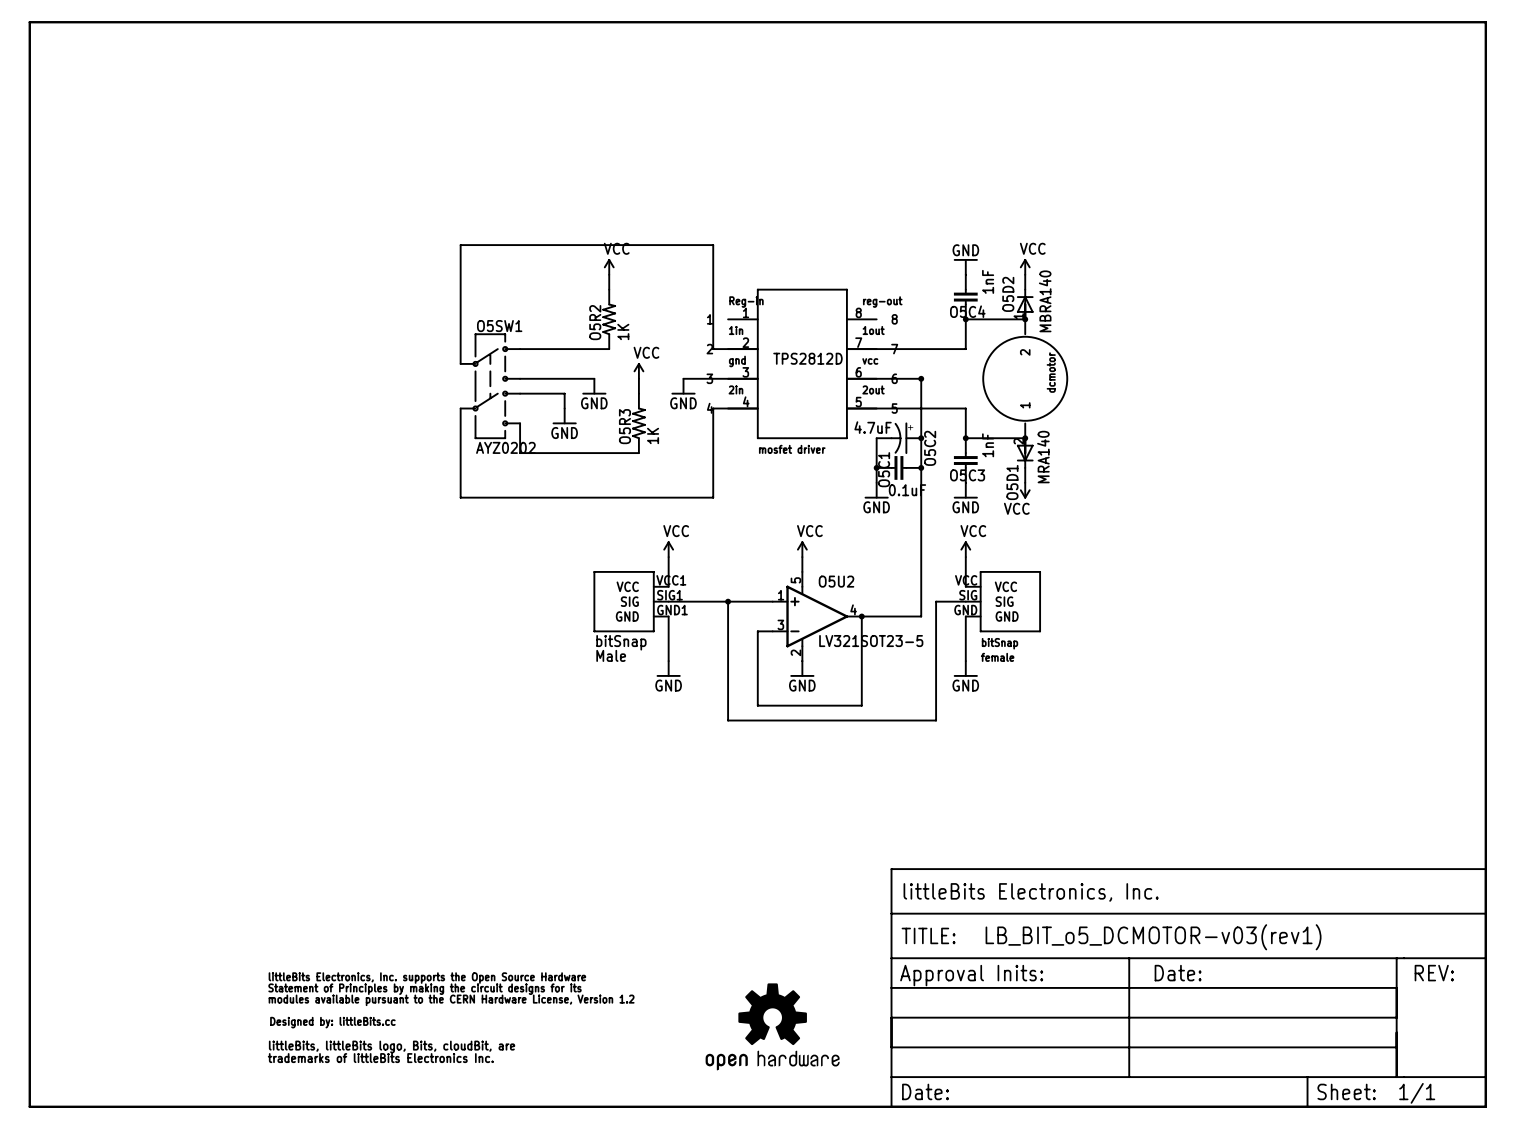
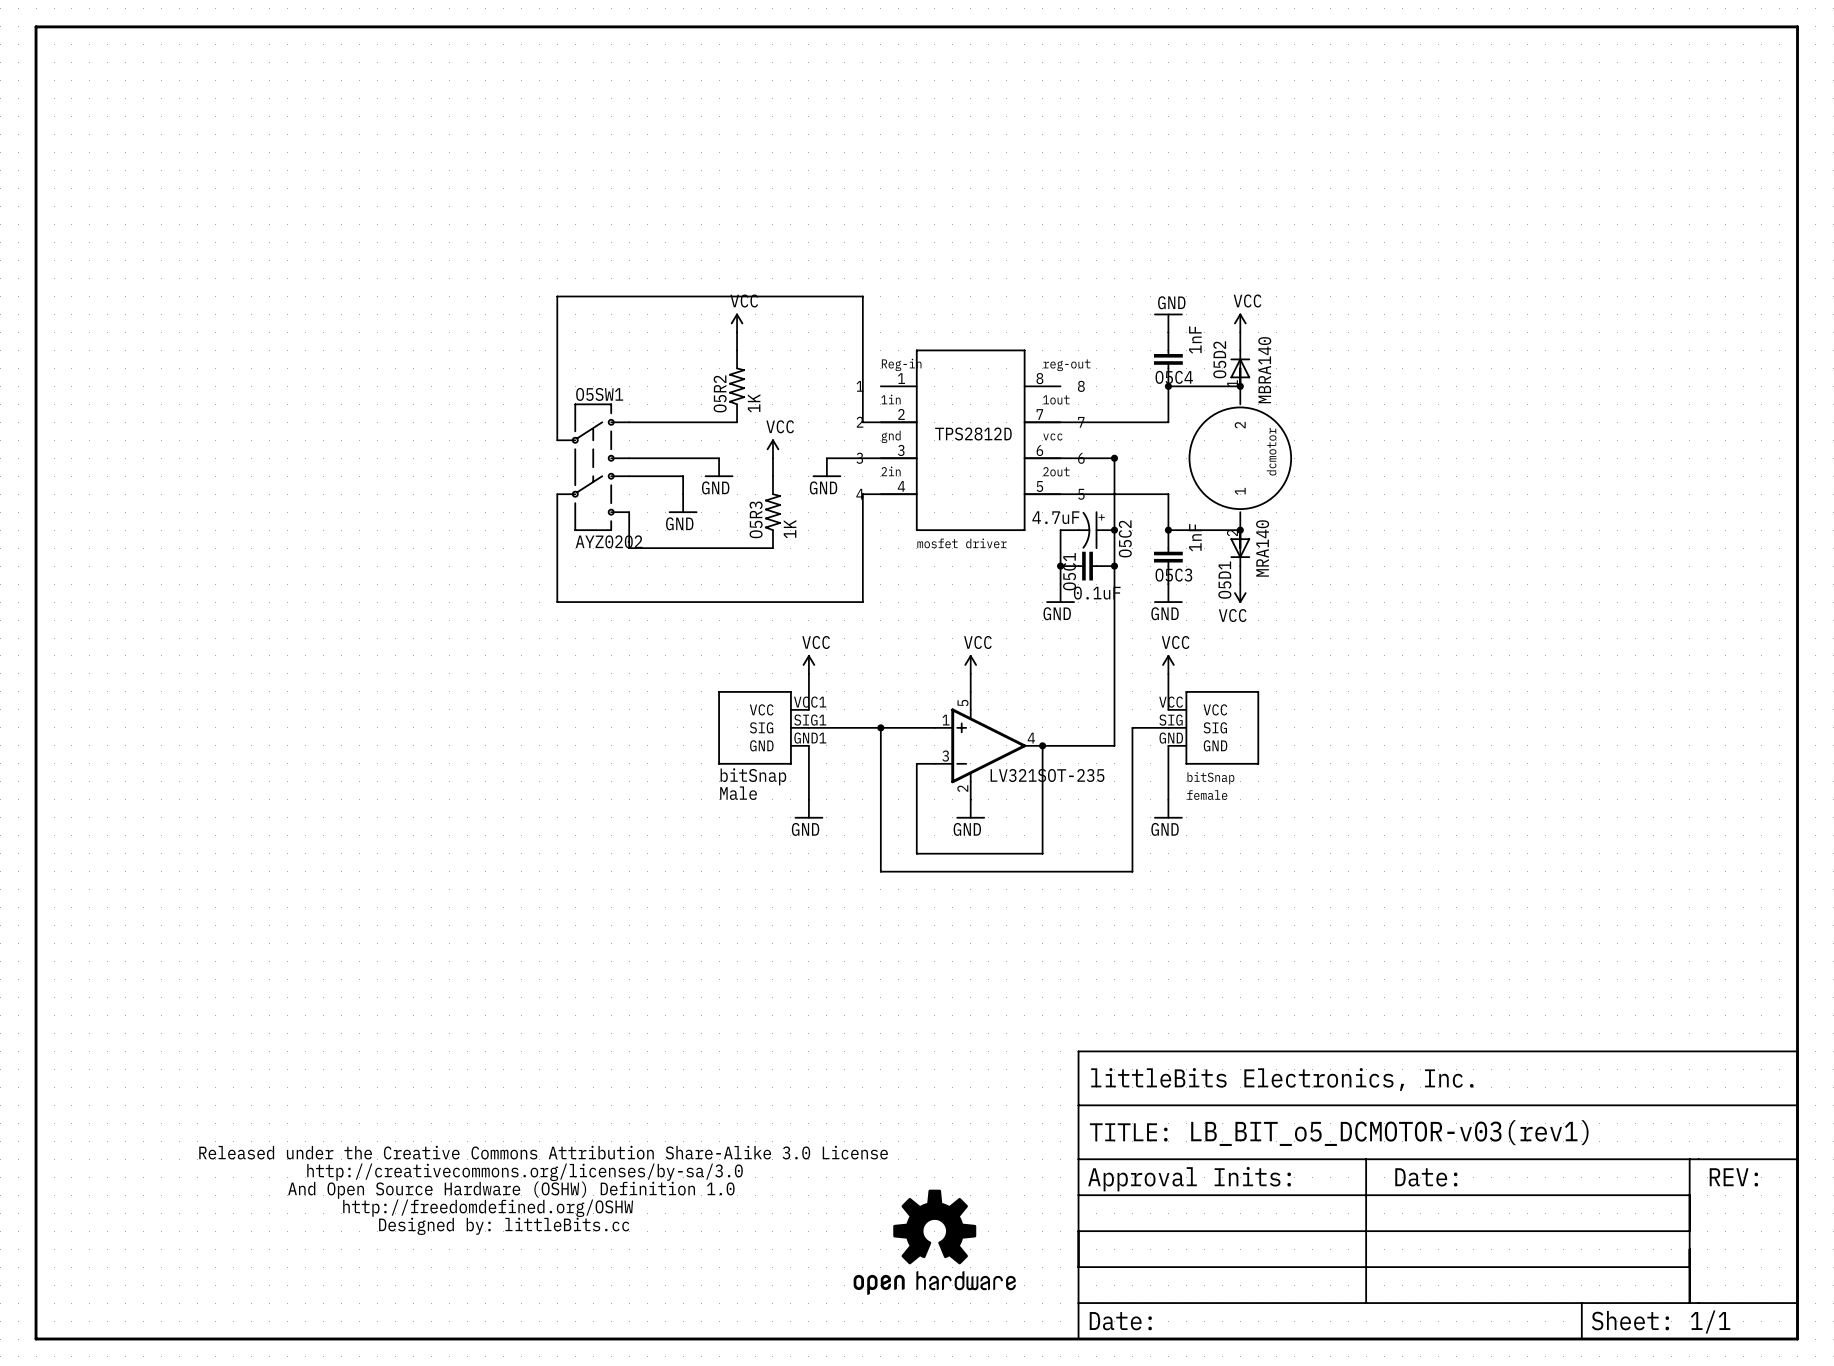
O5U2 name: O5U2 (836, 581) -> none
O5U2 value: LV321SOT23-5 (871, 641) -> LV321SOT-235 (1047, 775)
part: none -> (543, 1190)
part: (451, 1017) -> none

